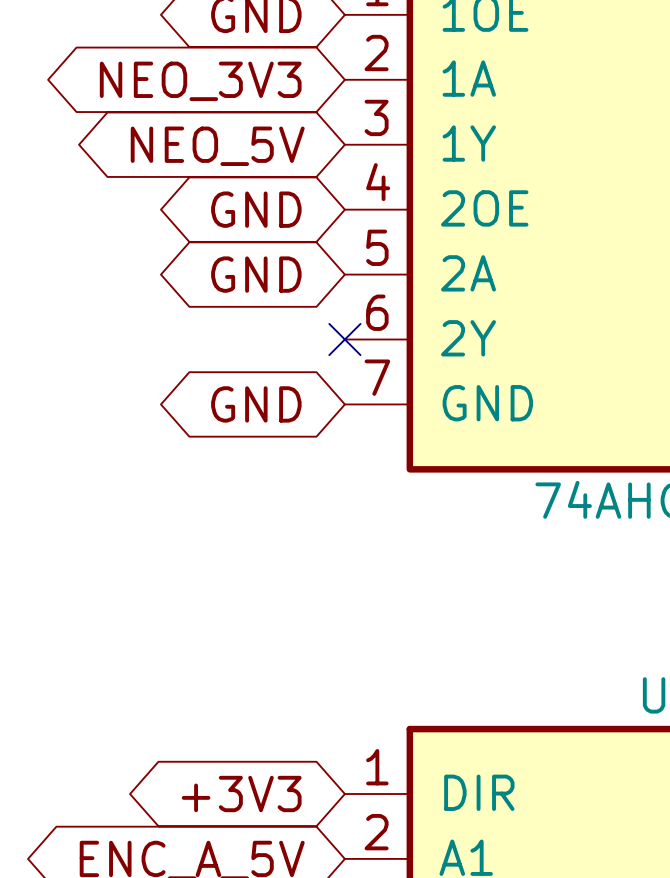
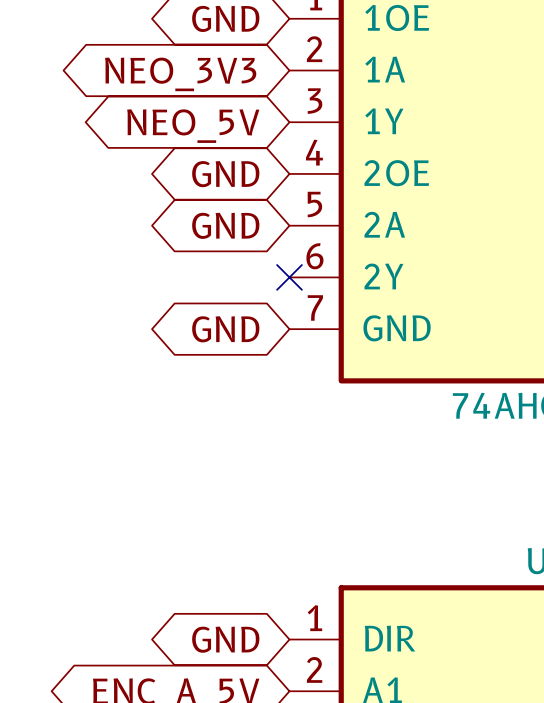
global label: +3V3 (241, 794) -> GND (225, 639)

